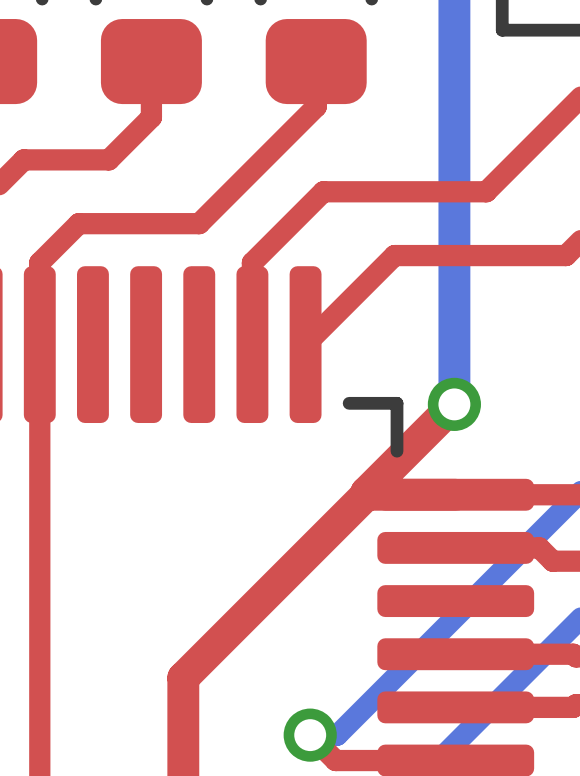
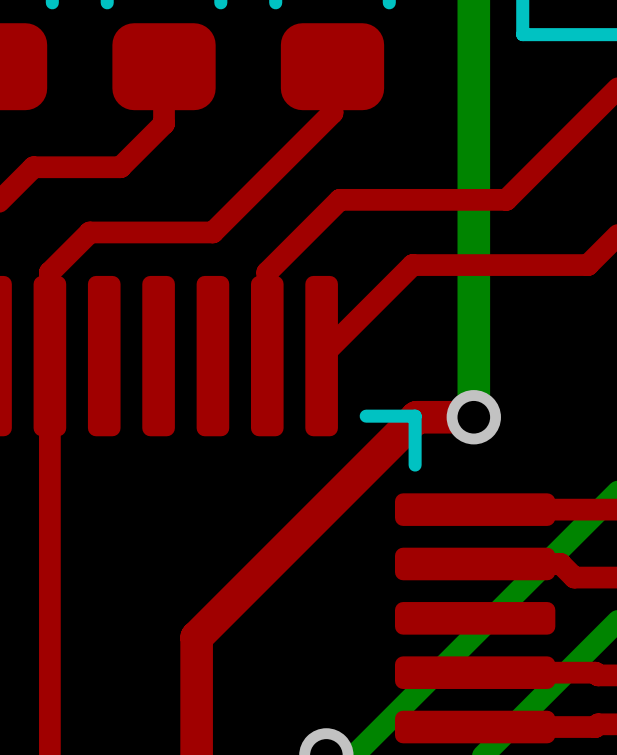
top track: (454, 404) (366, 492) (366, 494) -> none
top track: (366, 494) (183, 677) -> (473, 417) (416, 417) (196, 637) (196, 696)

